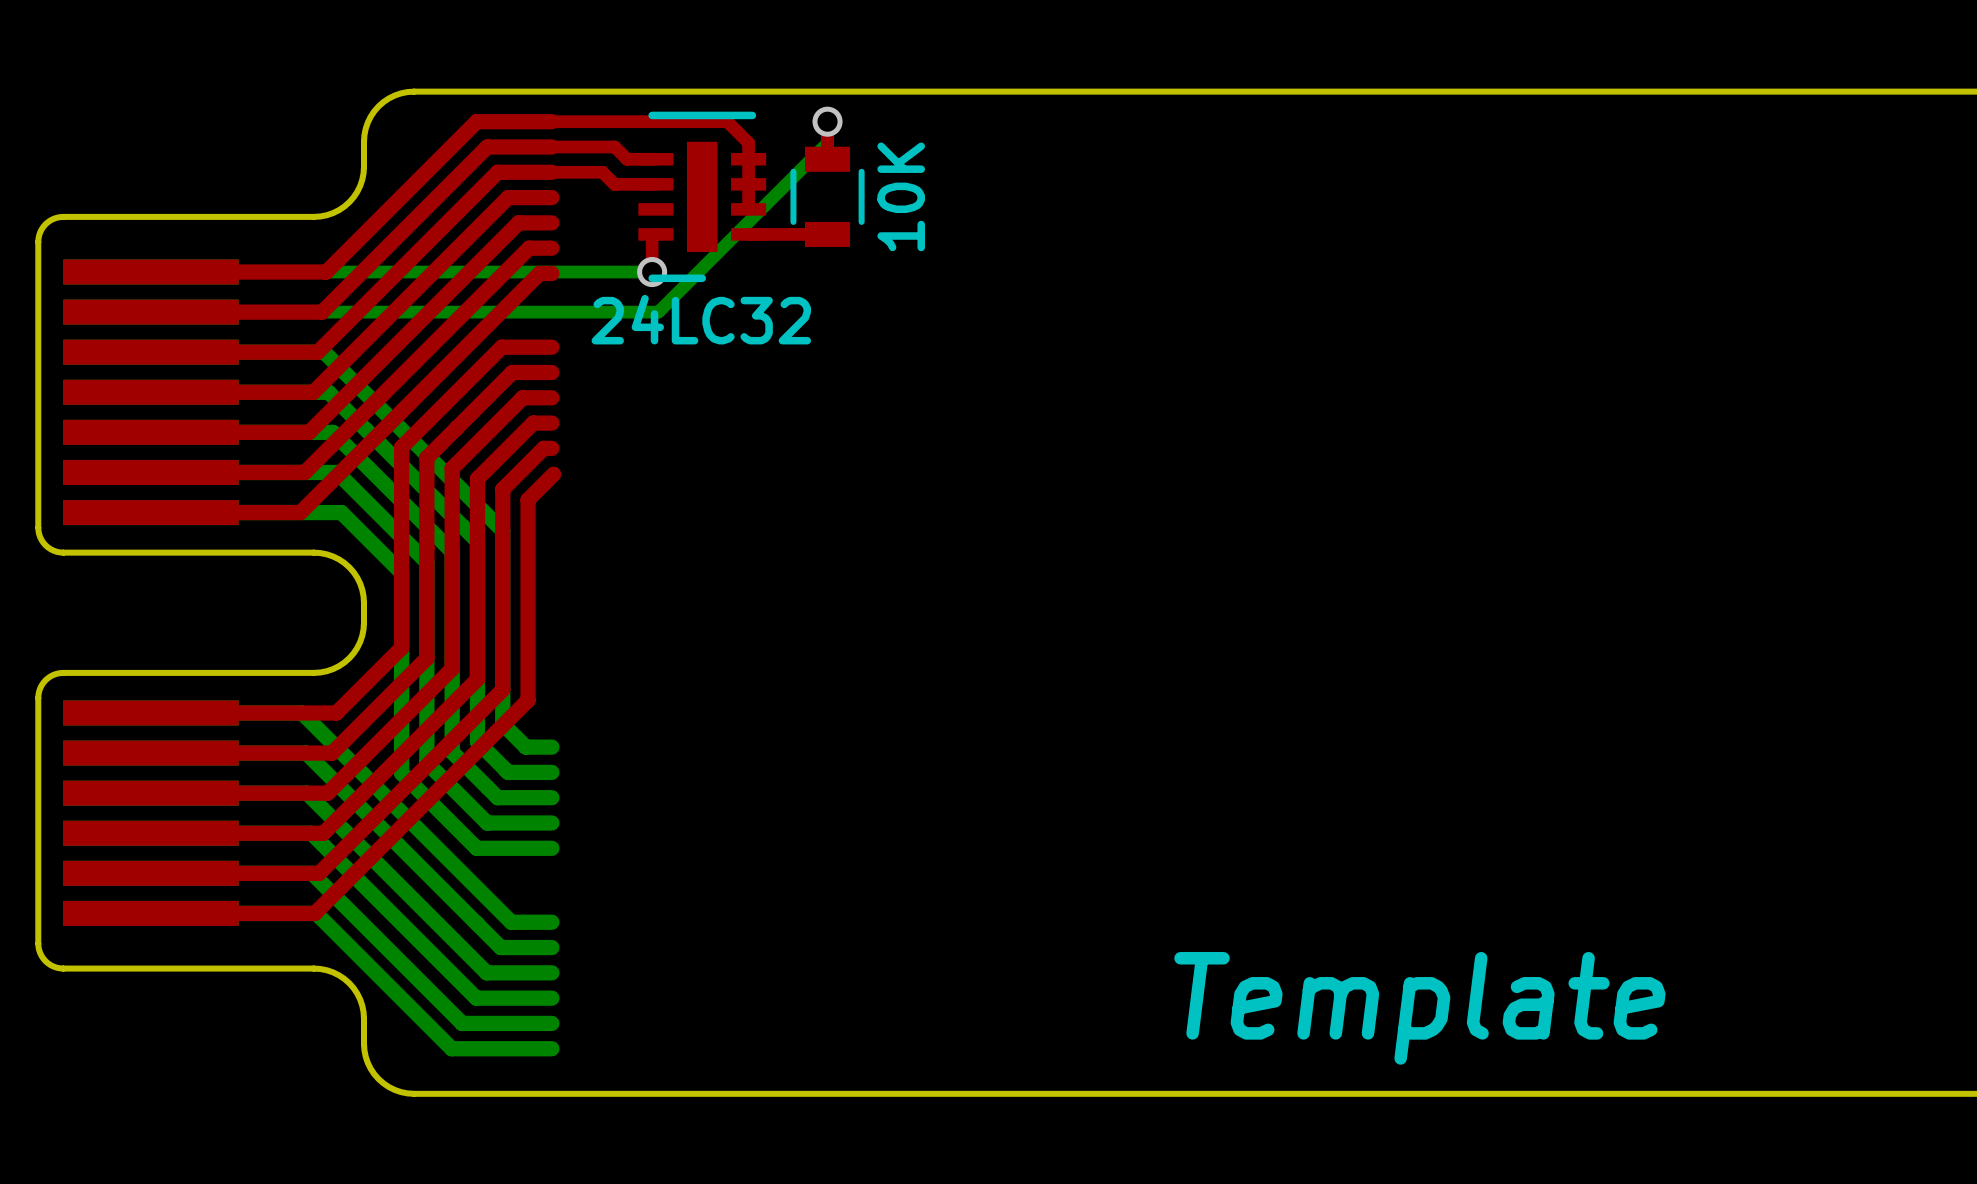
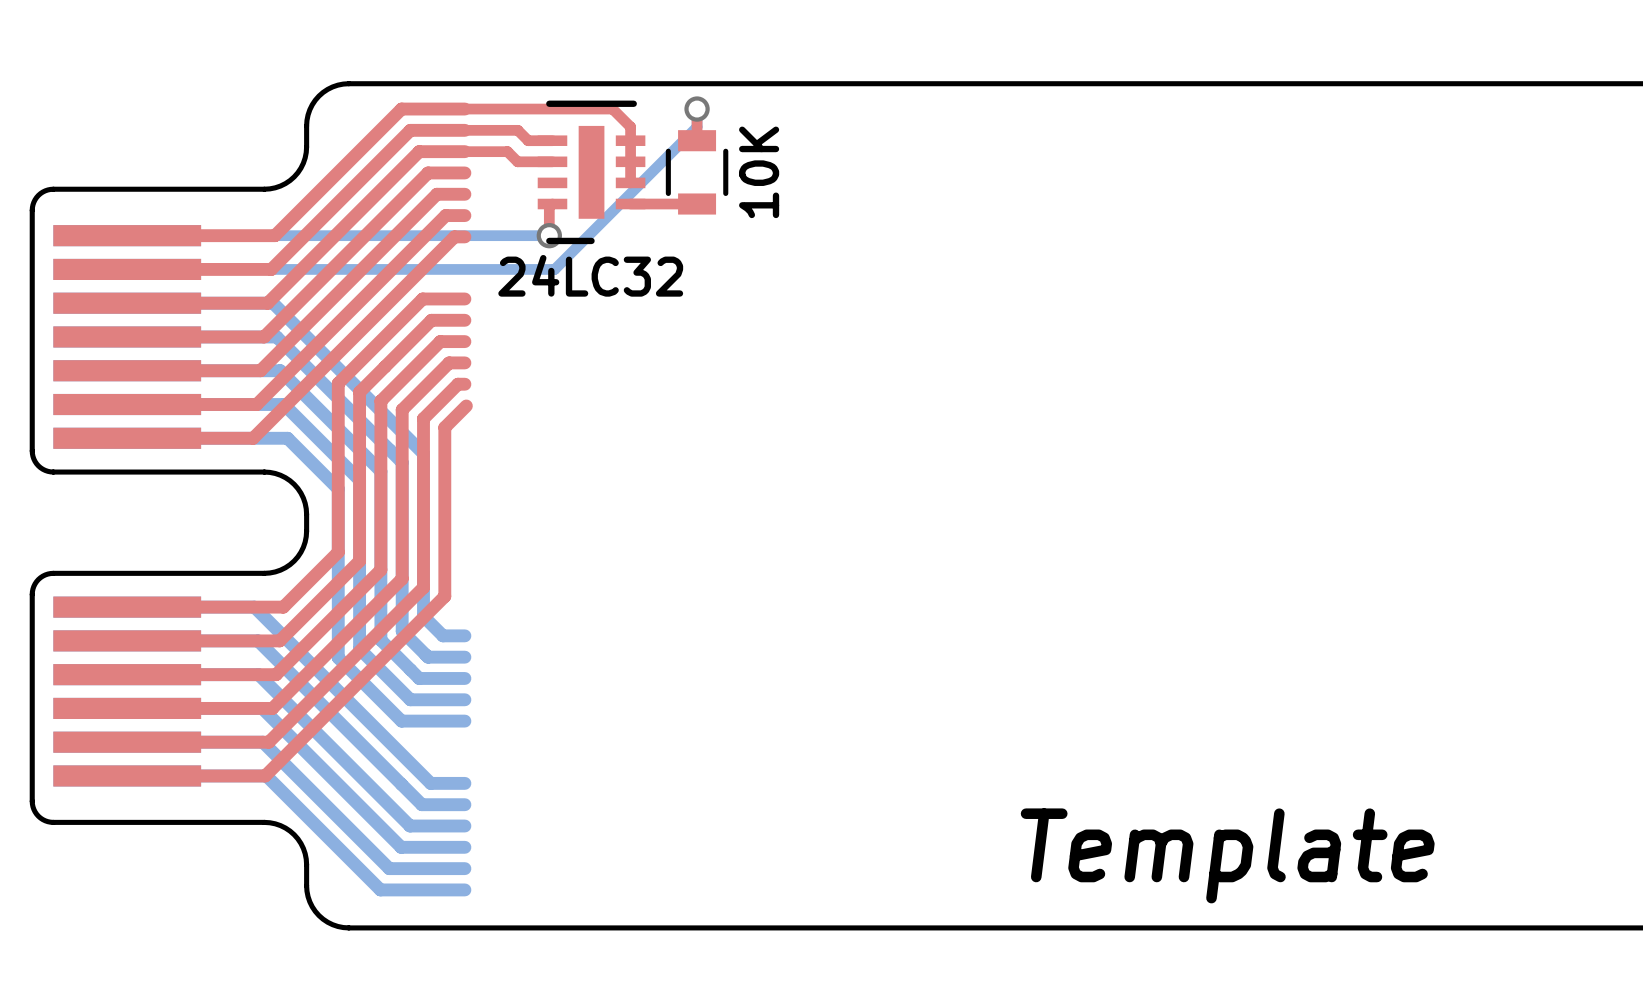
text position: Template (1419, 1008) -> Template (1227, 855)

